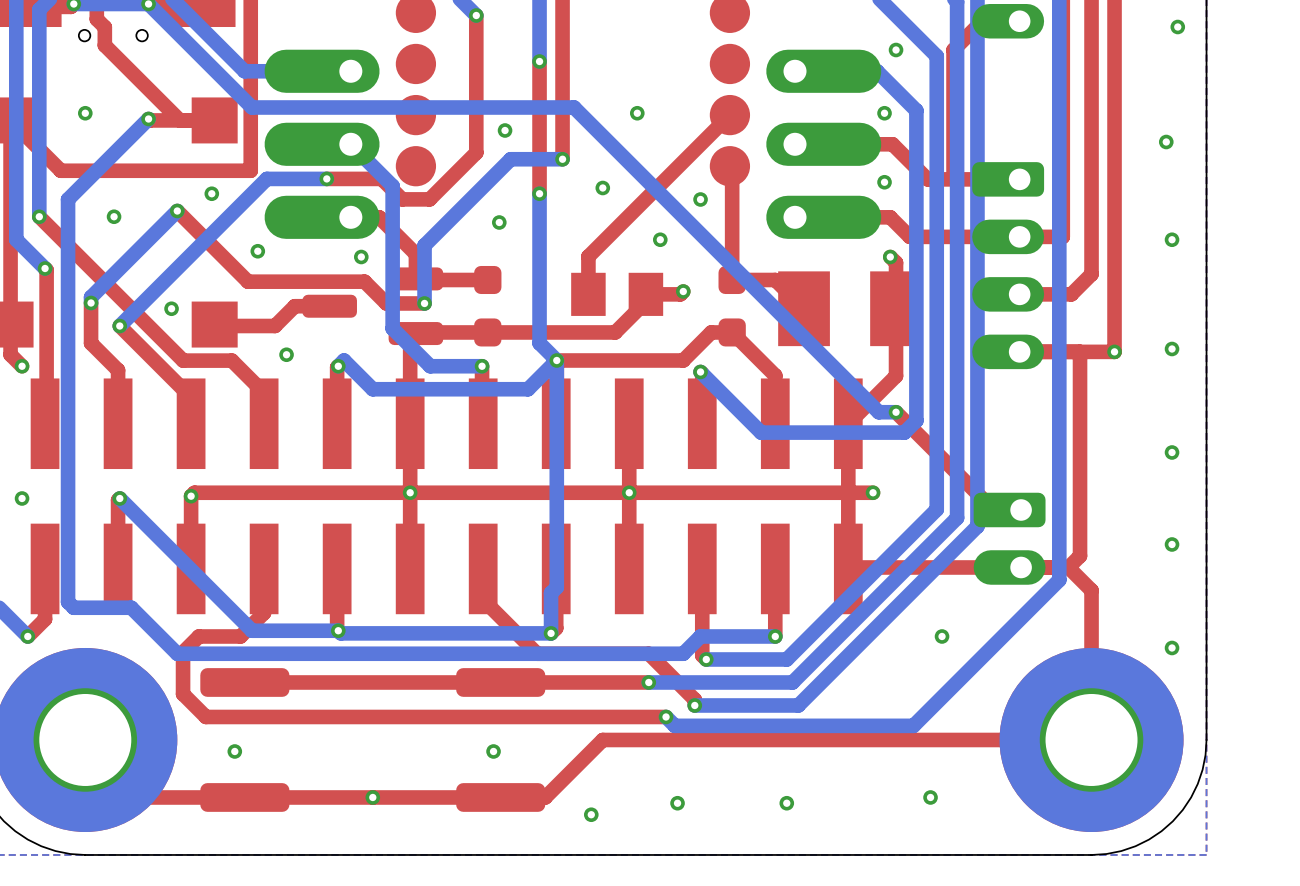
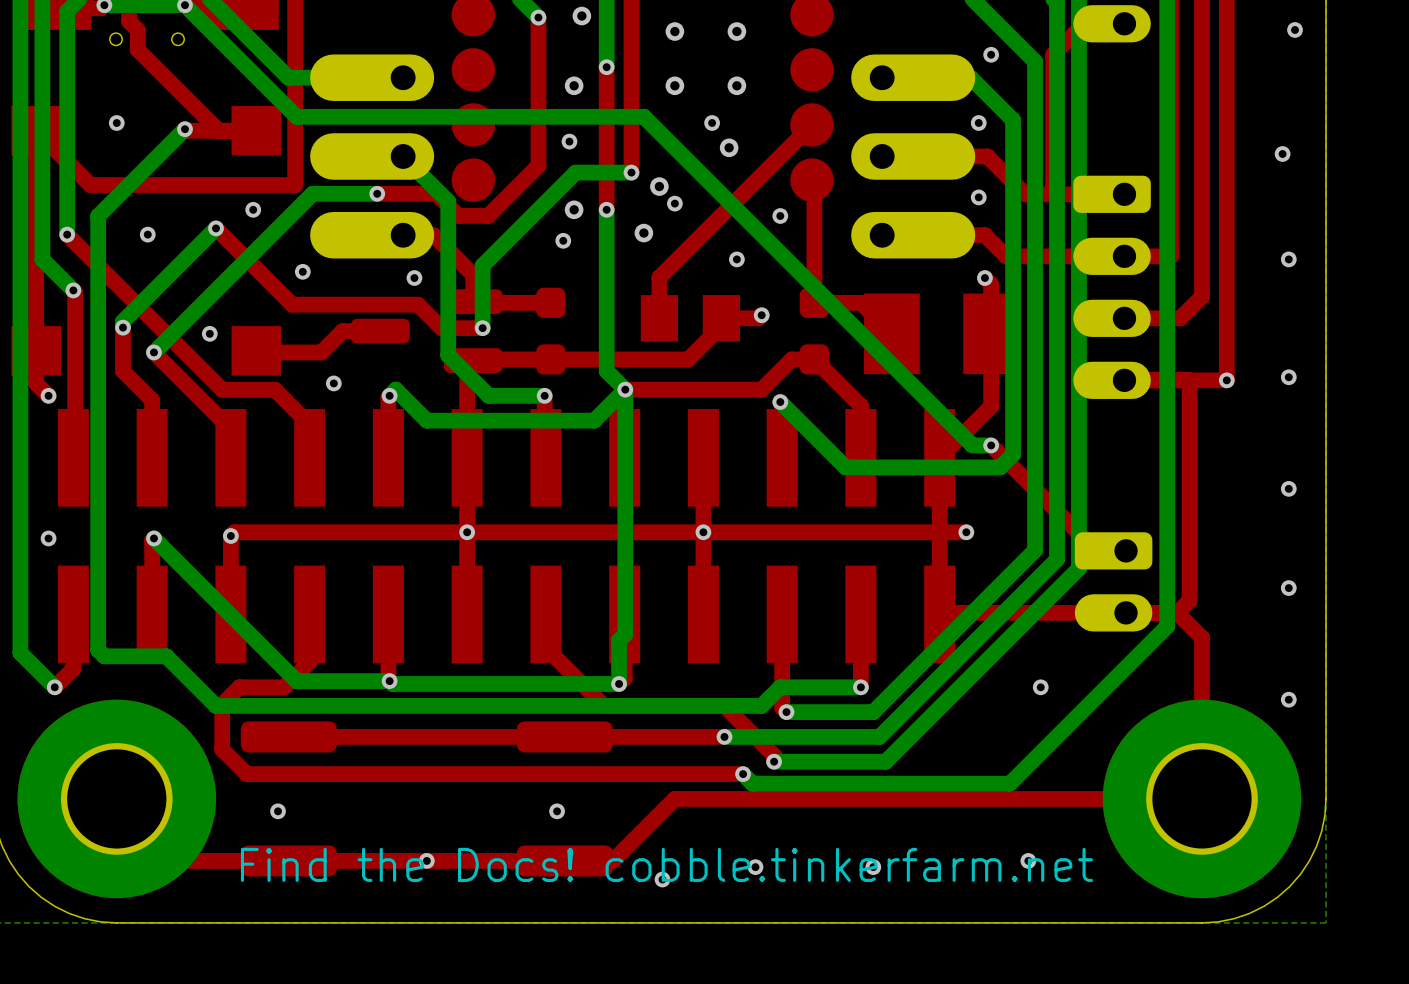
via: none -> (581, 16)
via: none -> (674, 31)
via: none -> (736, 31)
via: none -> (574, 85)
via: none -> (674, 85)
via: none -> (736, 85)
via: none -> (729, 147)
via: none -> (659, 186)
via: none -> (574, 209)
via: none -> (643, 233)
text: none -> Find the Docs! cobble.tinkerfarm.net (666, 864)

